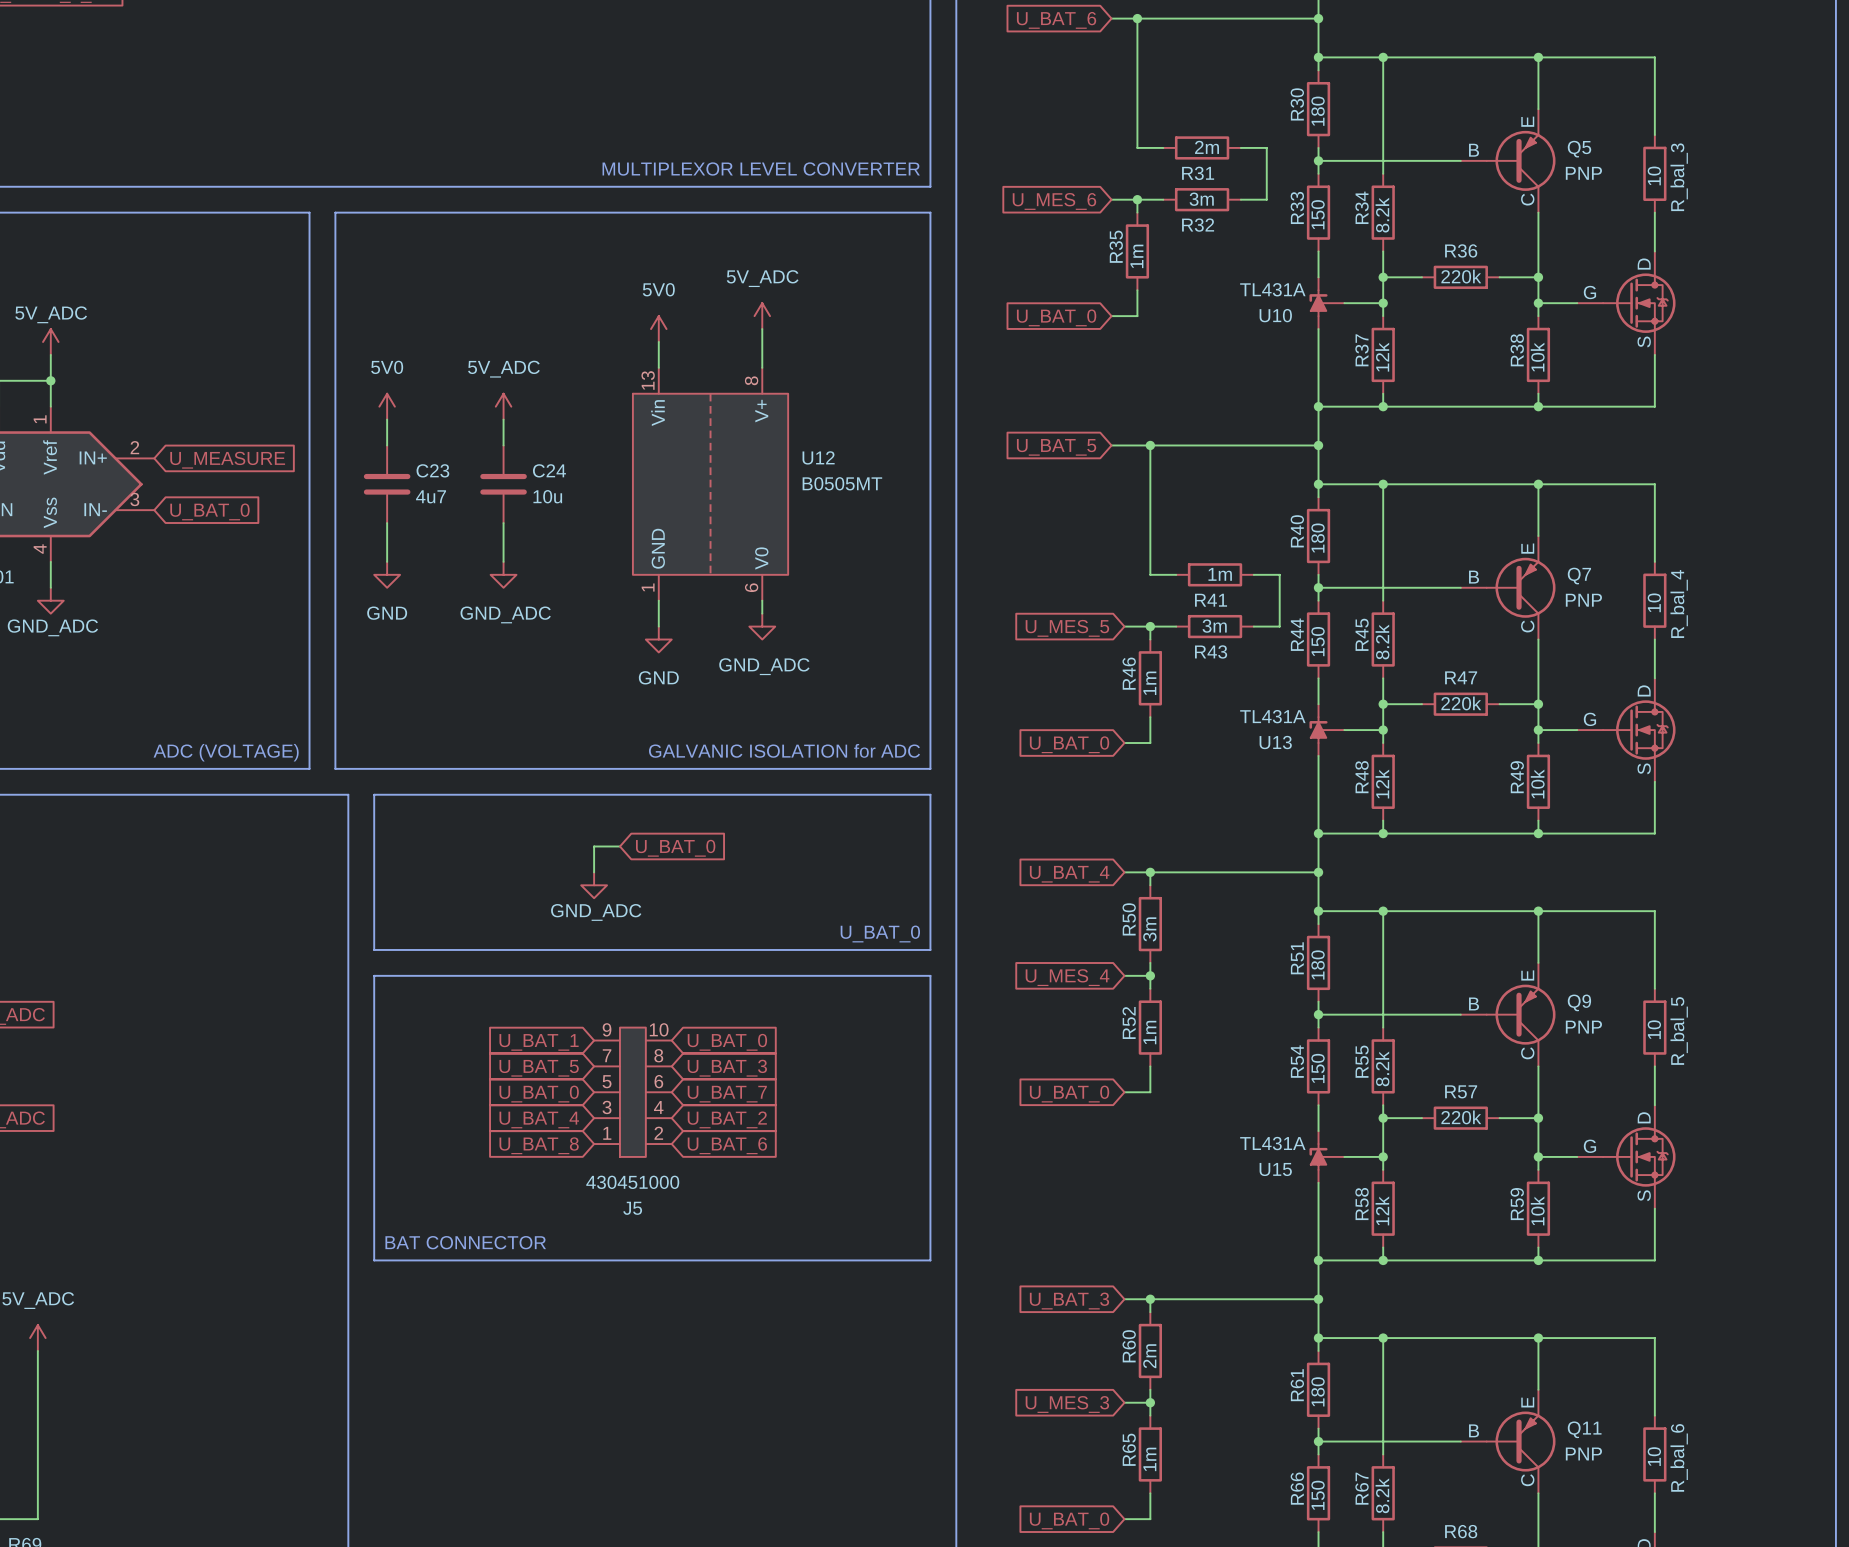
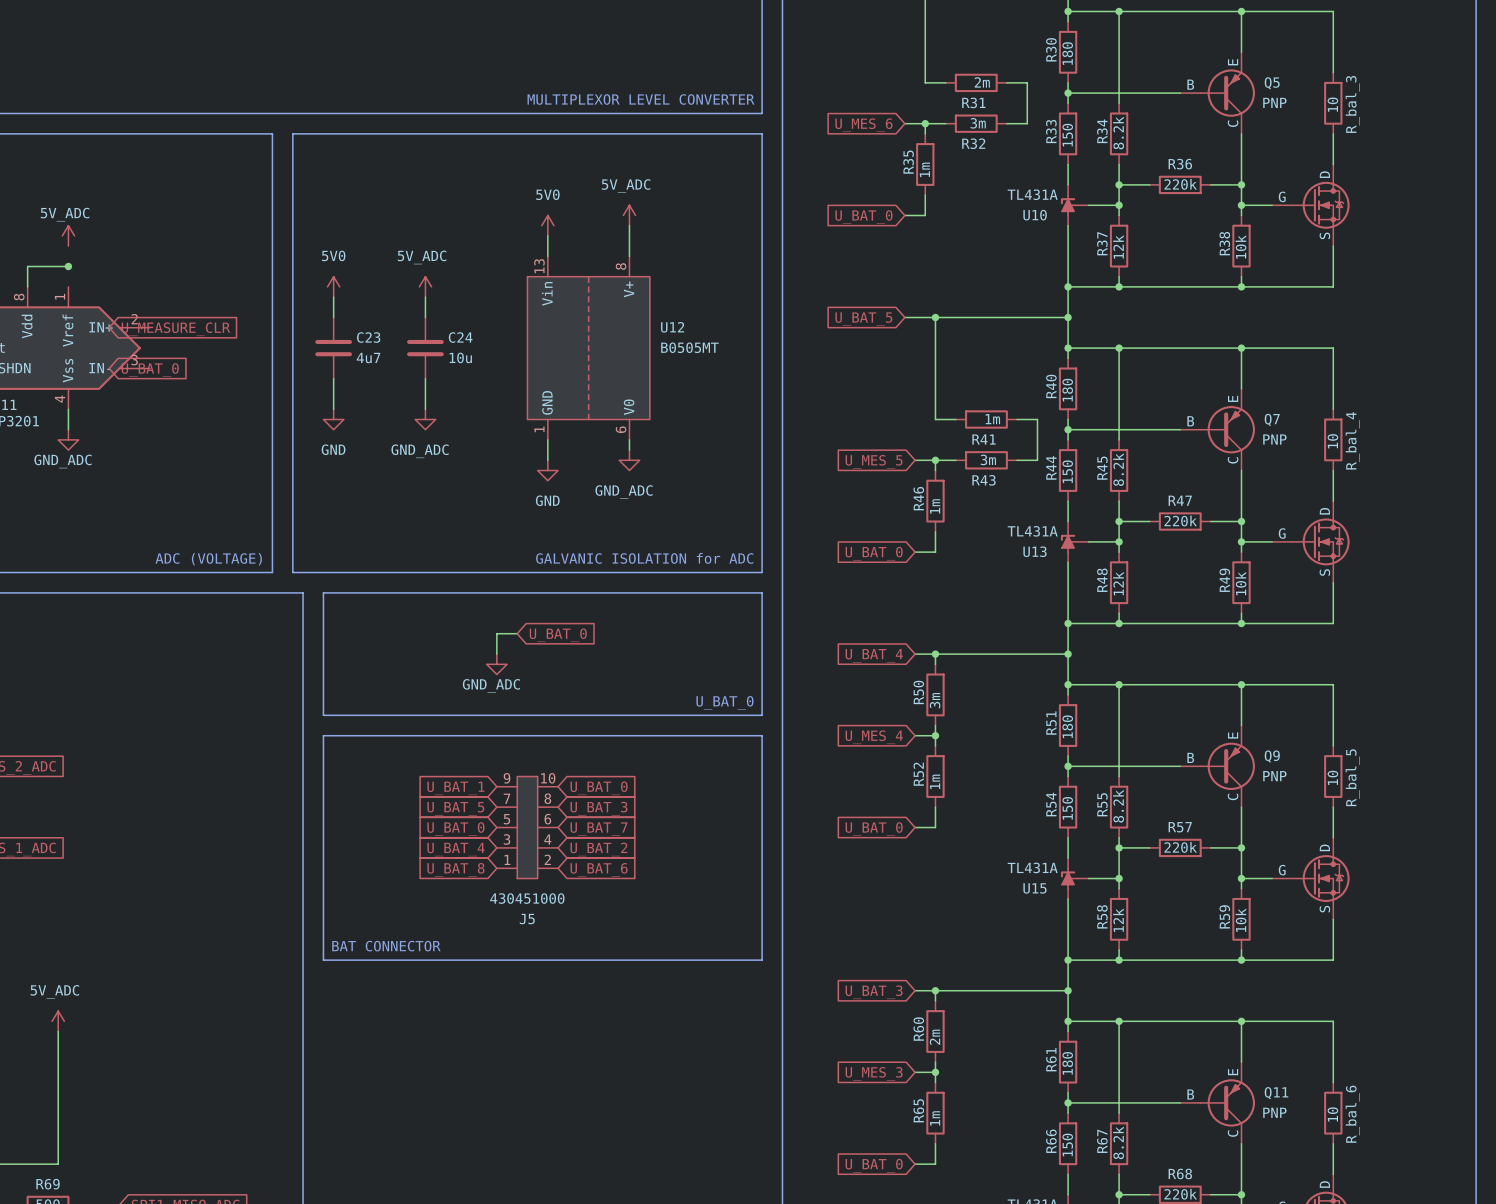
wire: (50, 354) (50, 406) -> none
global label: U_MEASURE (227, 460) -> U_MEASURE_CLR (175, 329)
global label position: U_BAT_0 (209, 511) -> U_BAT_0 (150, 370)

